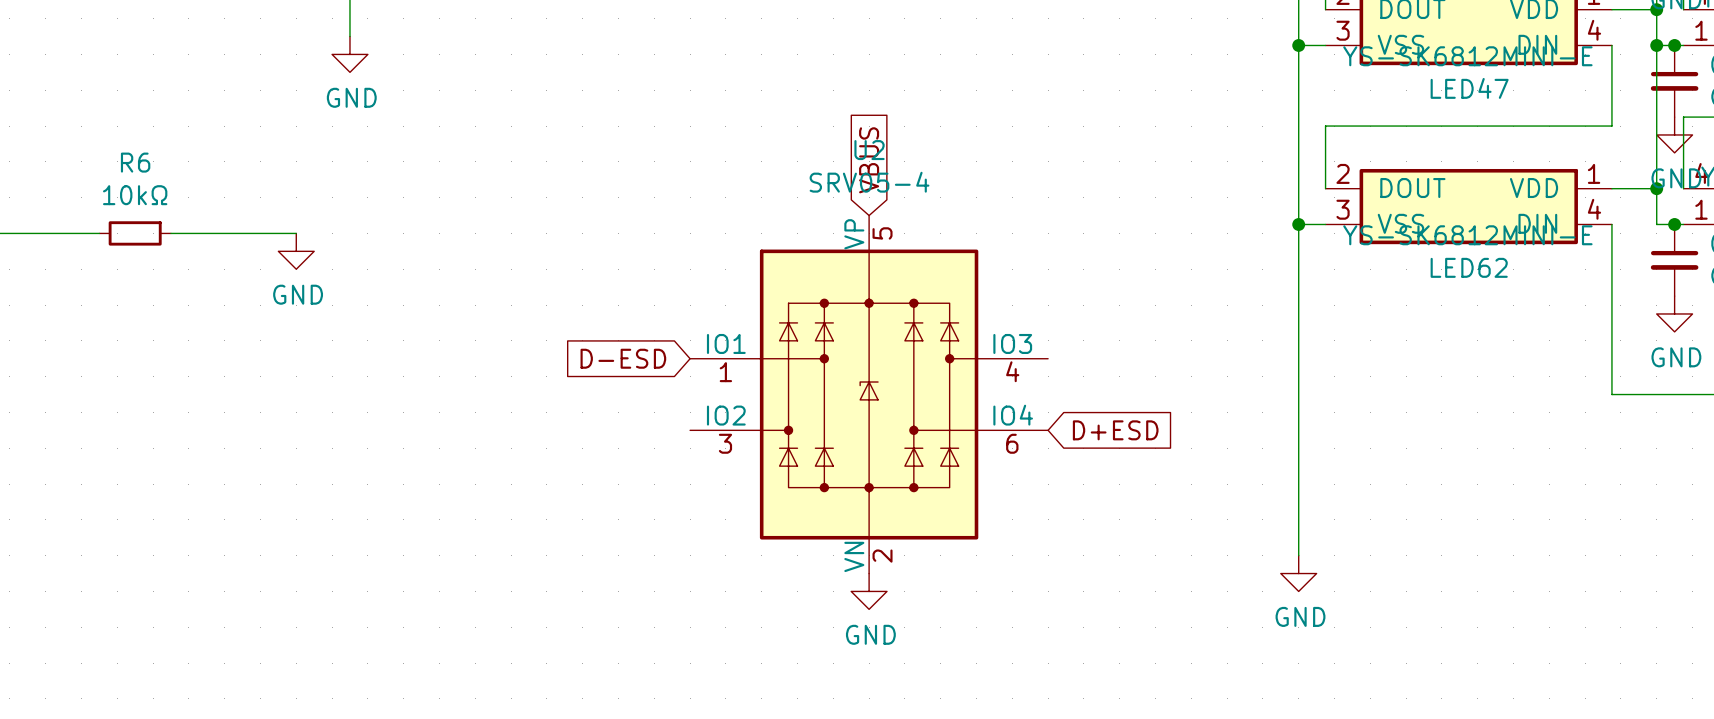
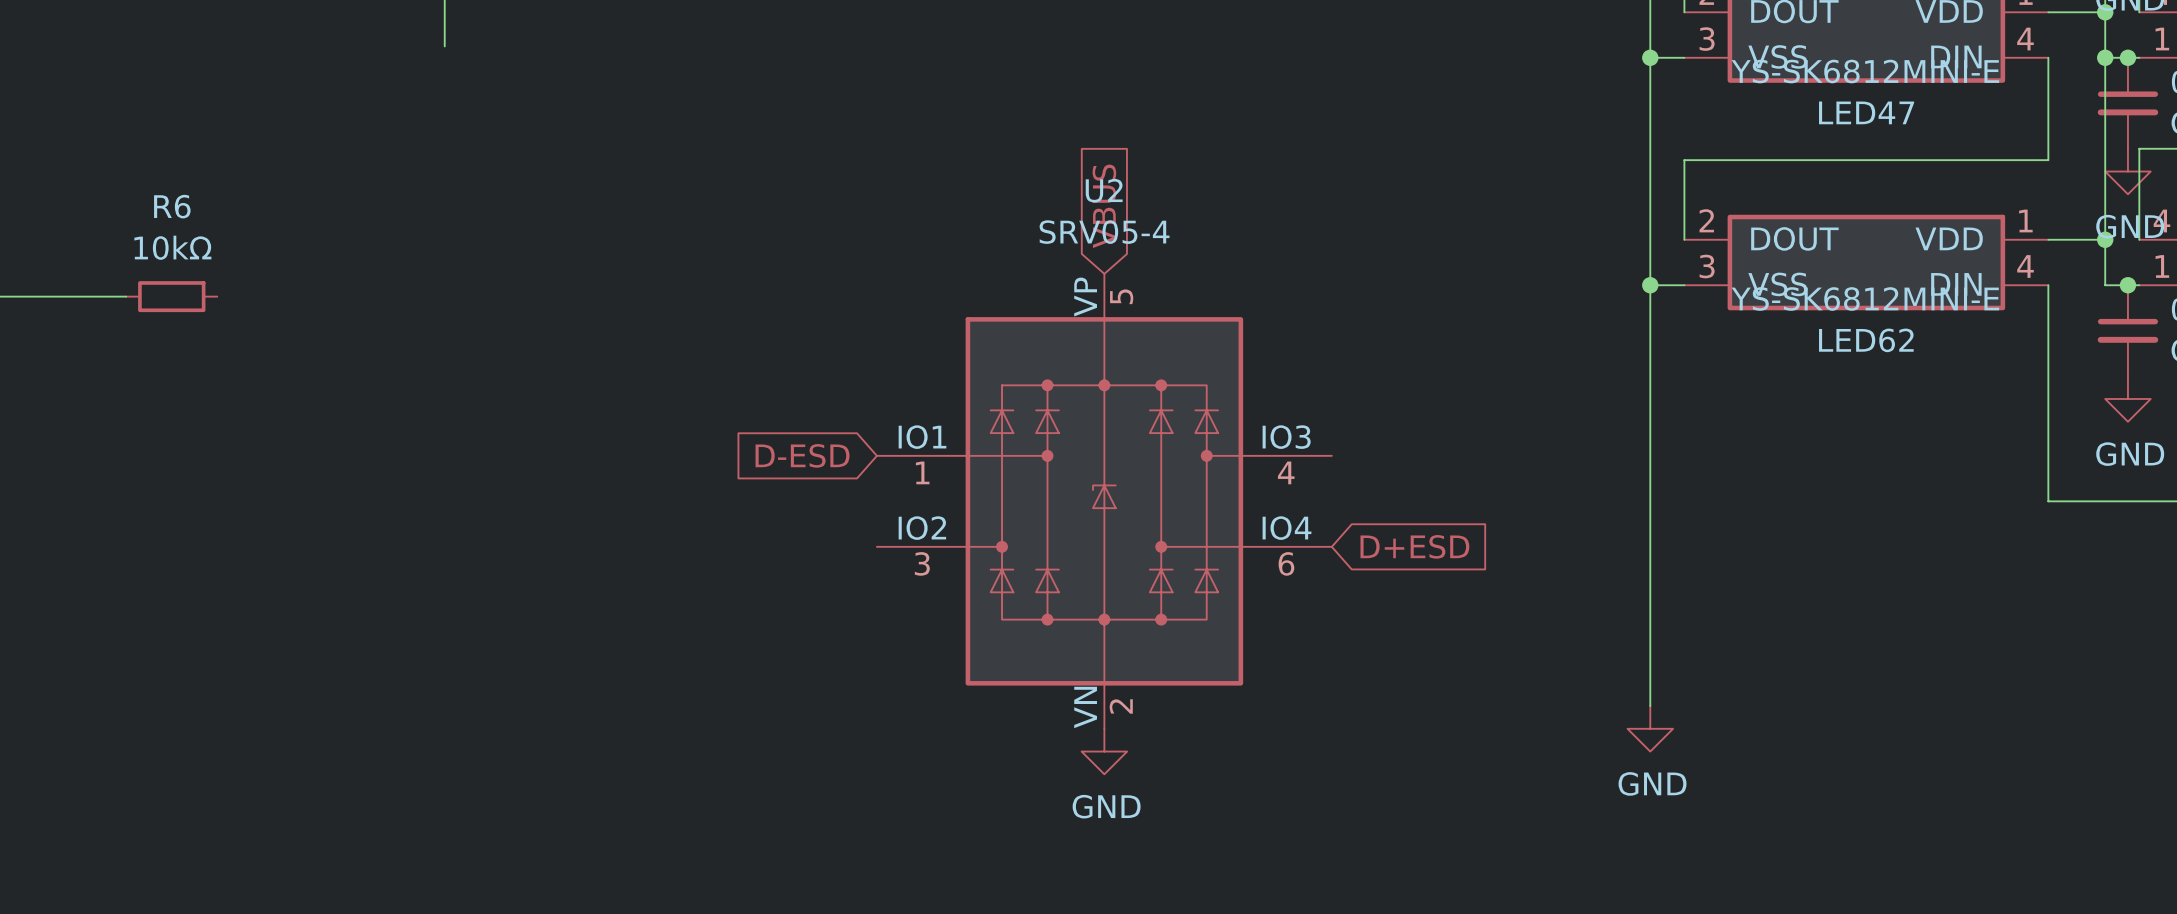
power symbol: GND (349, 54) -> none
wire: (170, 233) (296, 233) -> none
power symbol: GND (296, 251) -> none

